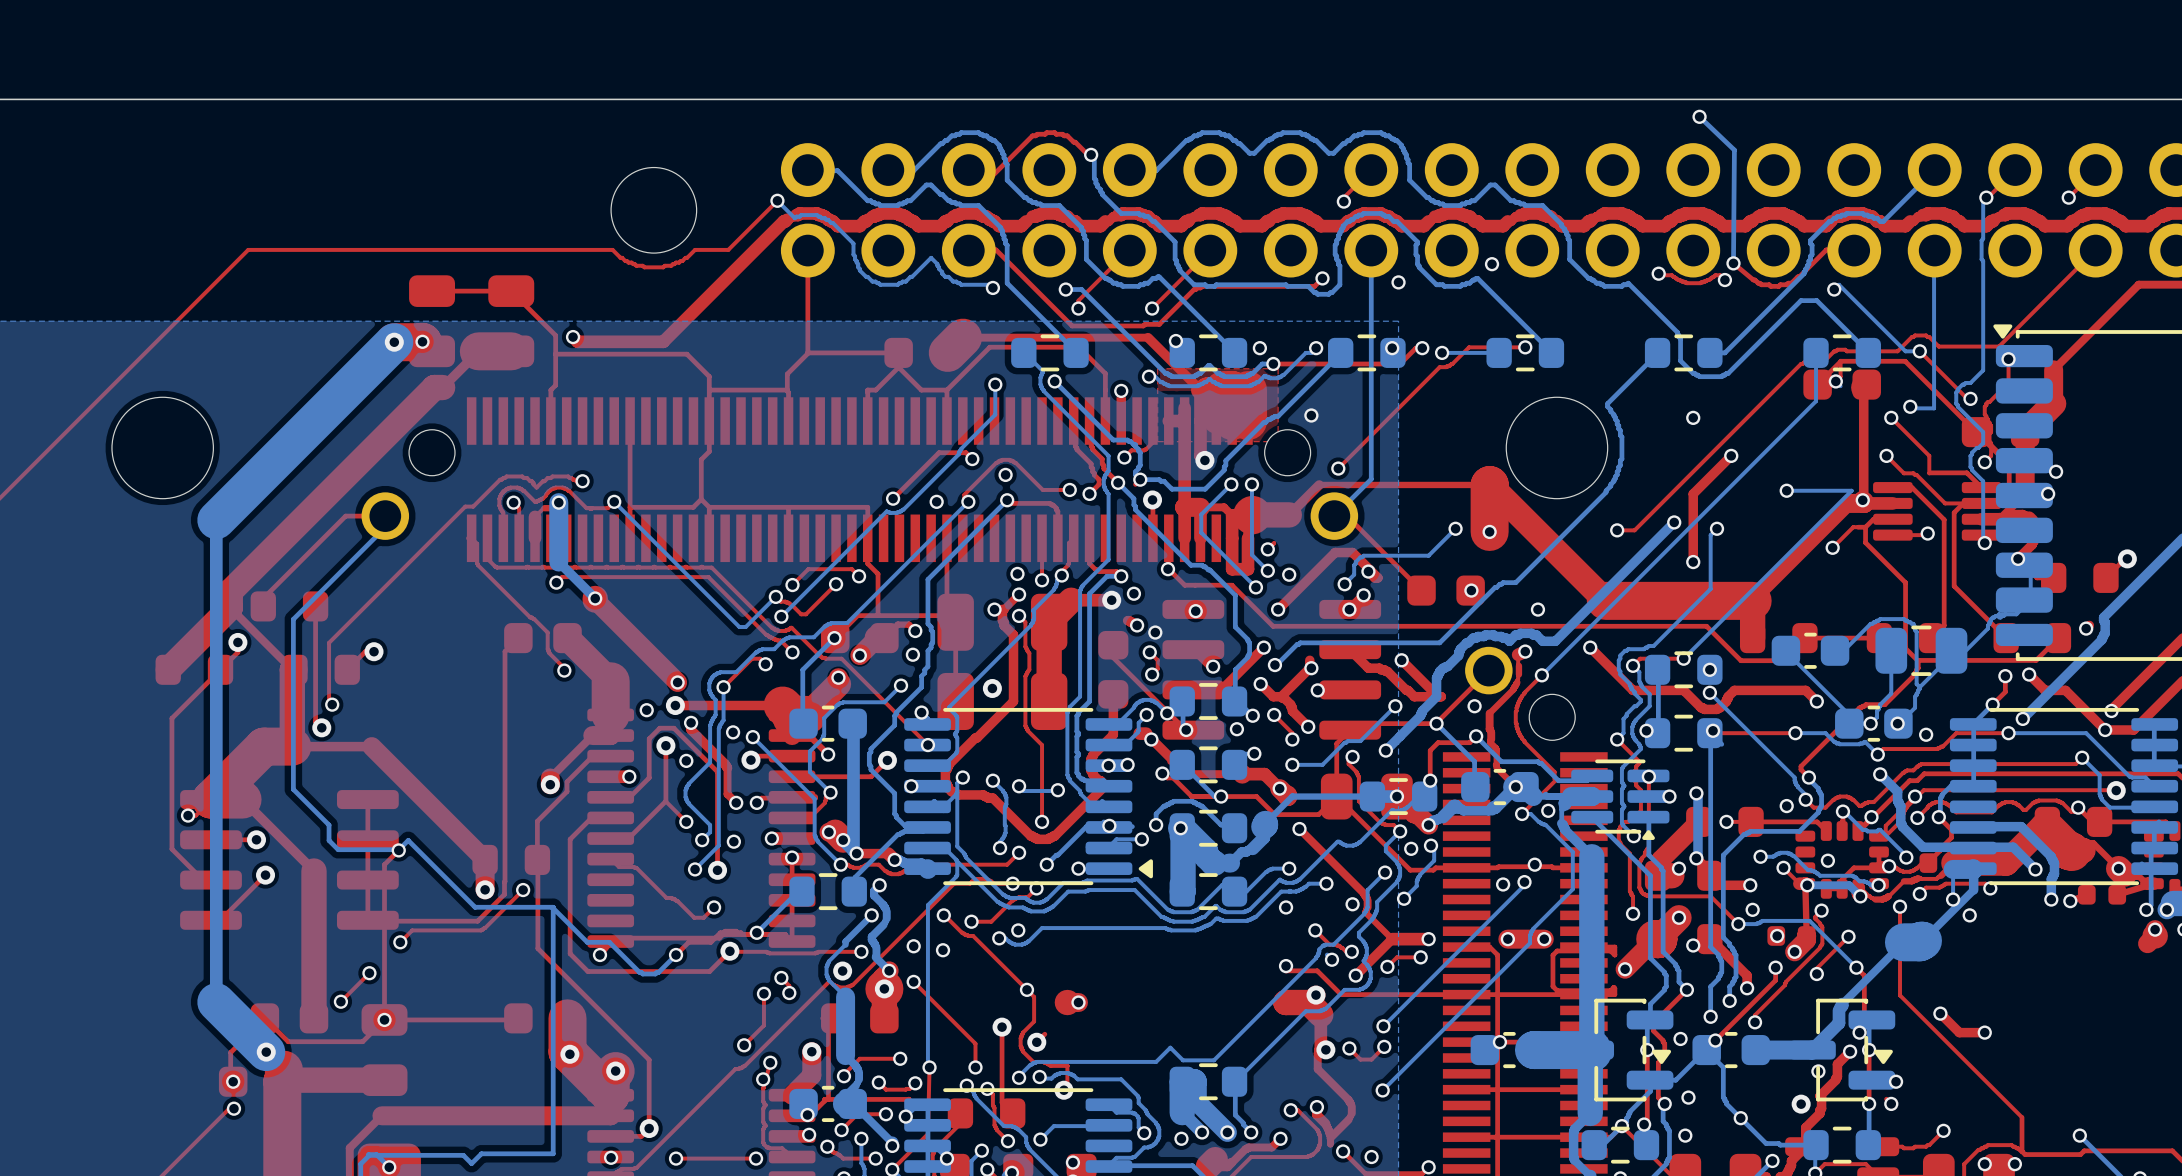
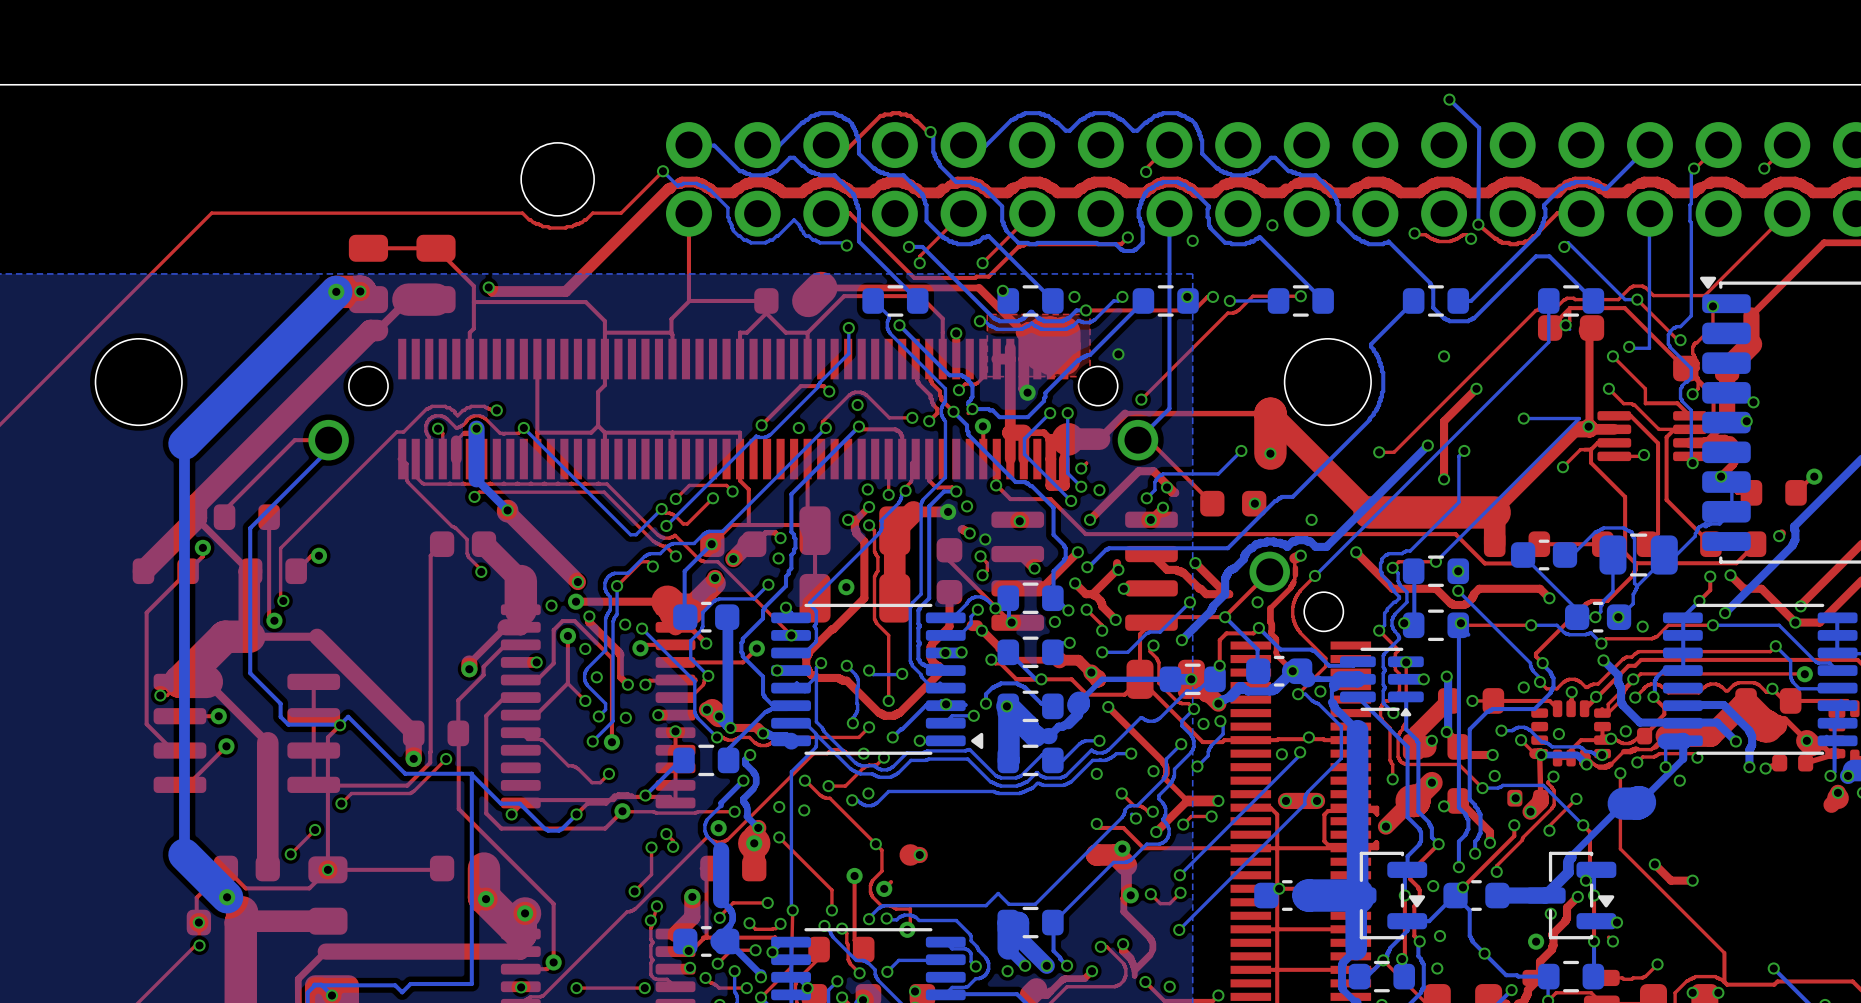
via: none -> (596, 677)
bottom track: (1842, 811) (1862, 829) (1867, 831) (1880, 829) (1906, 857) -> none

